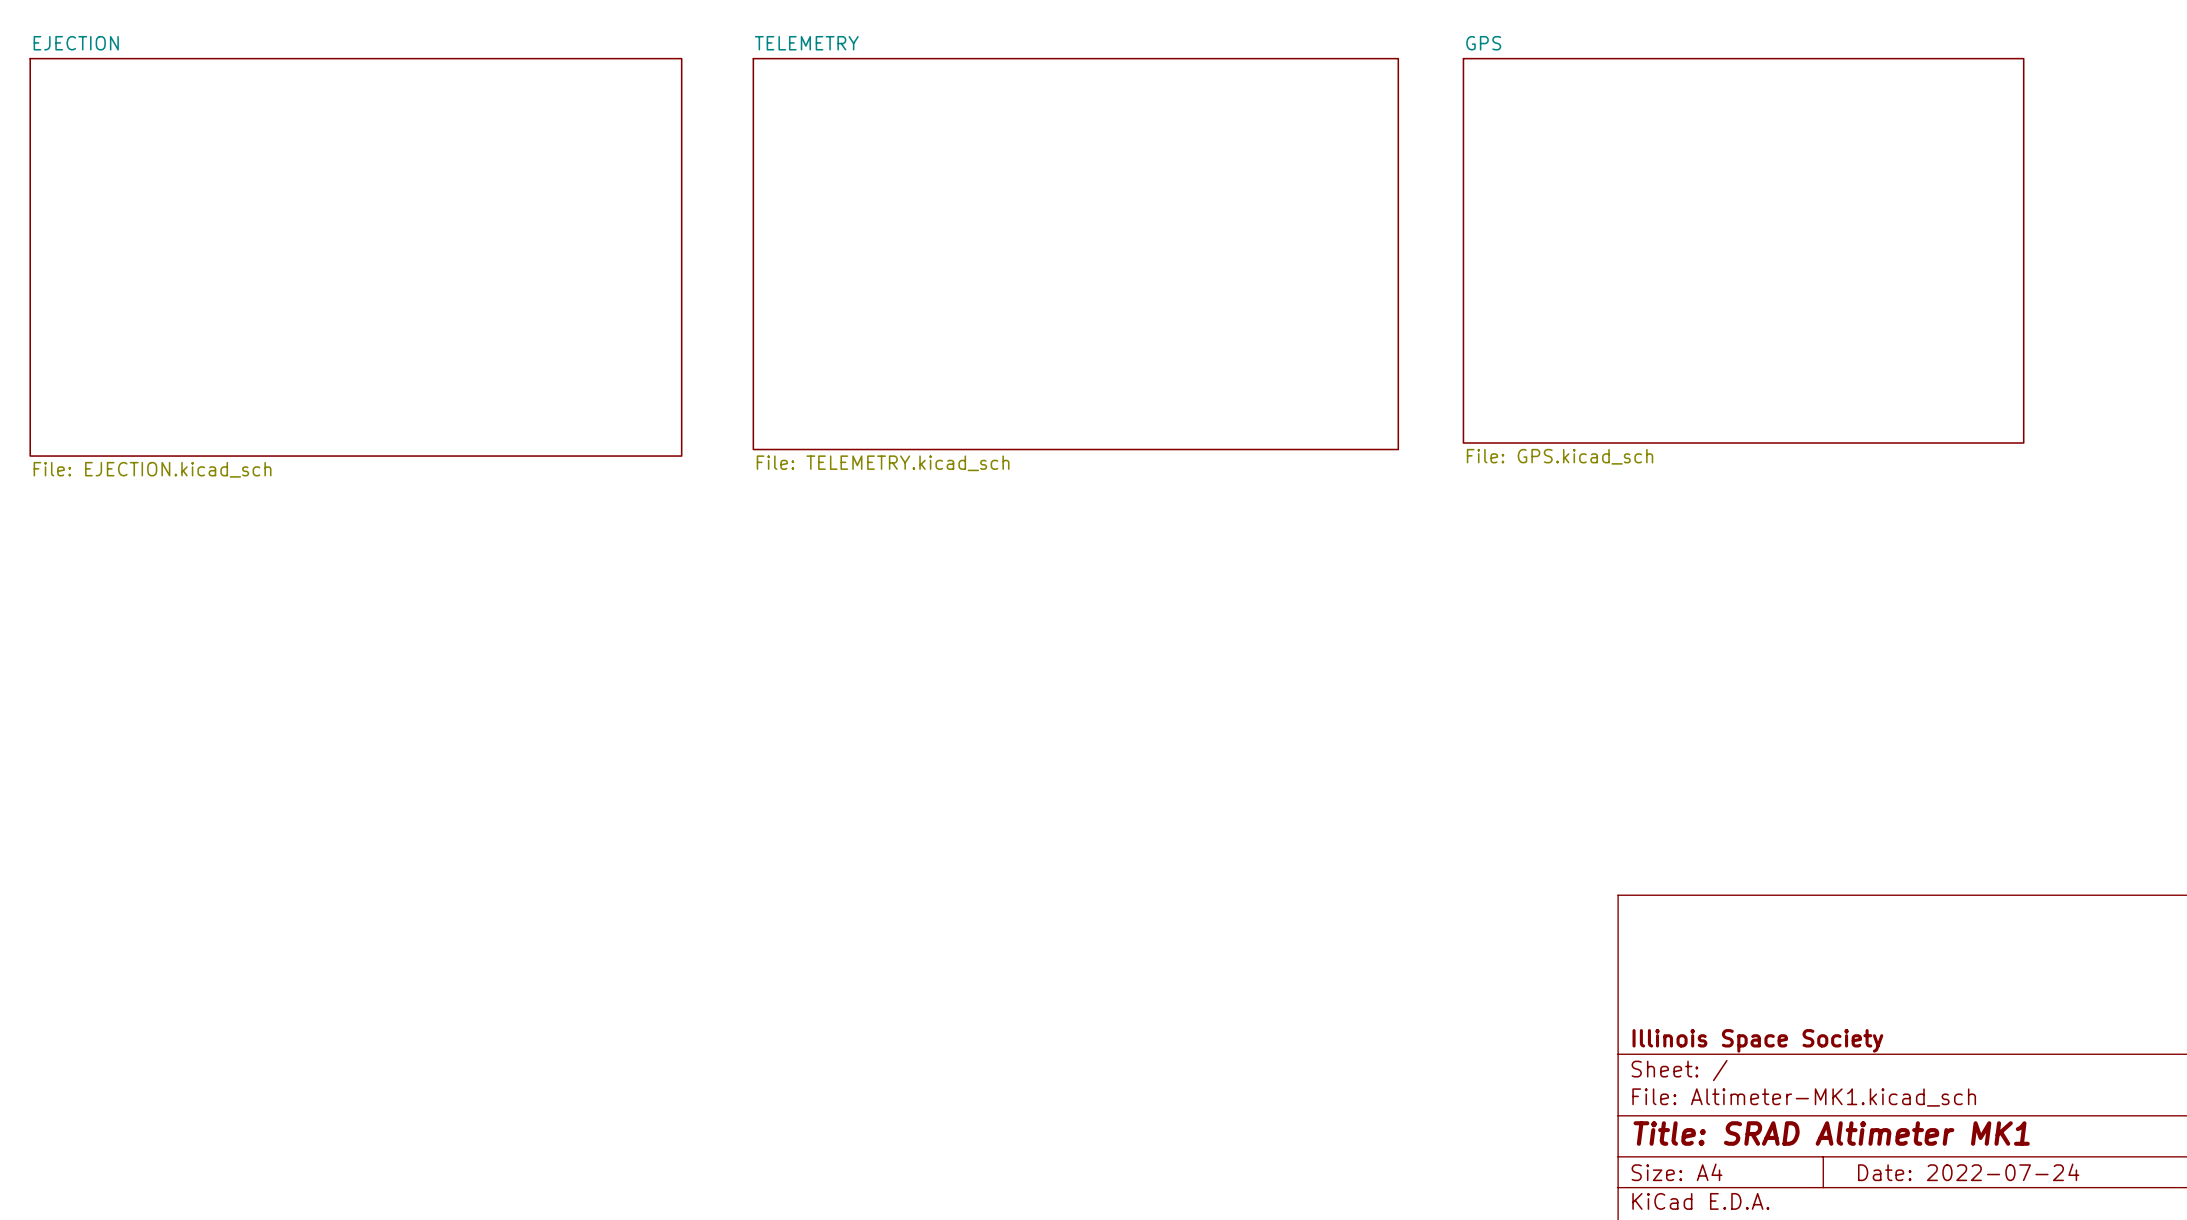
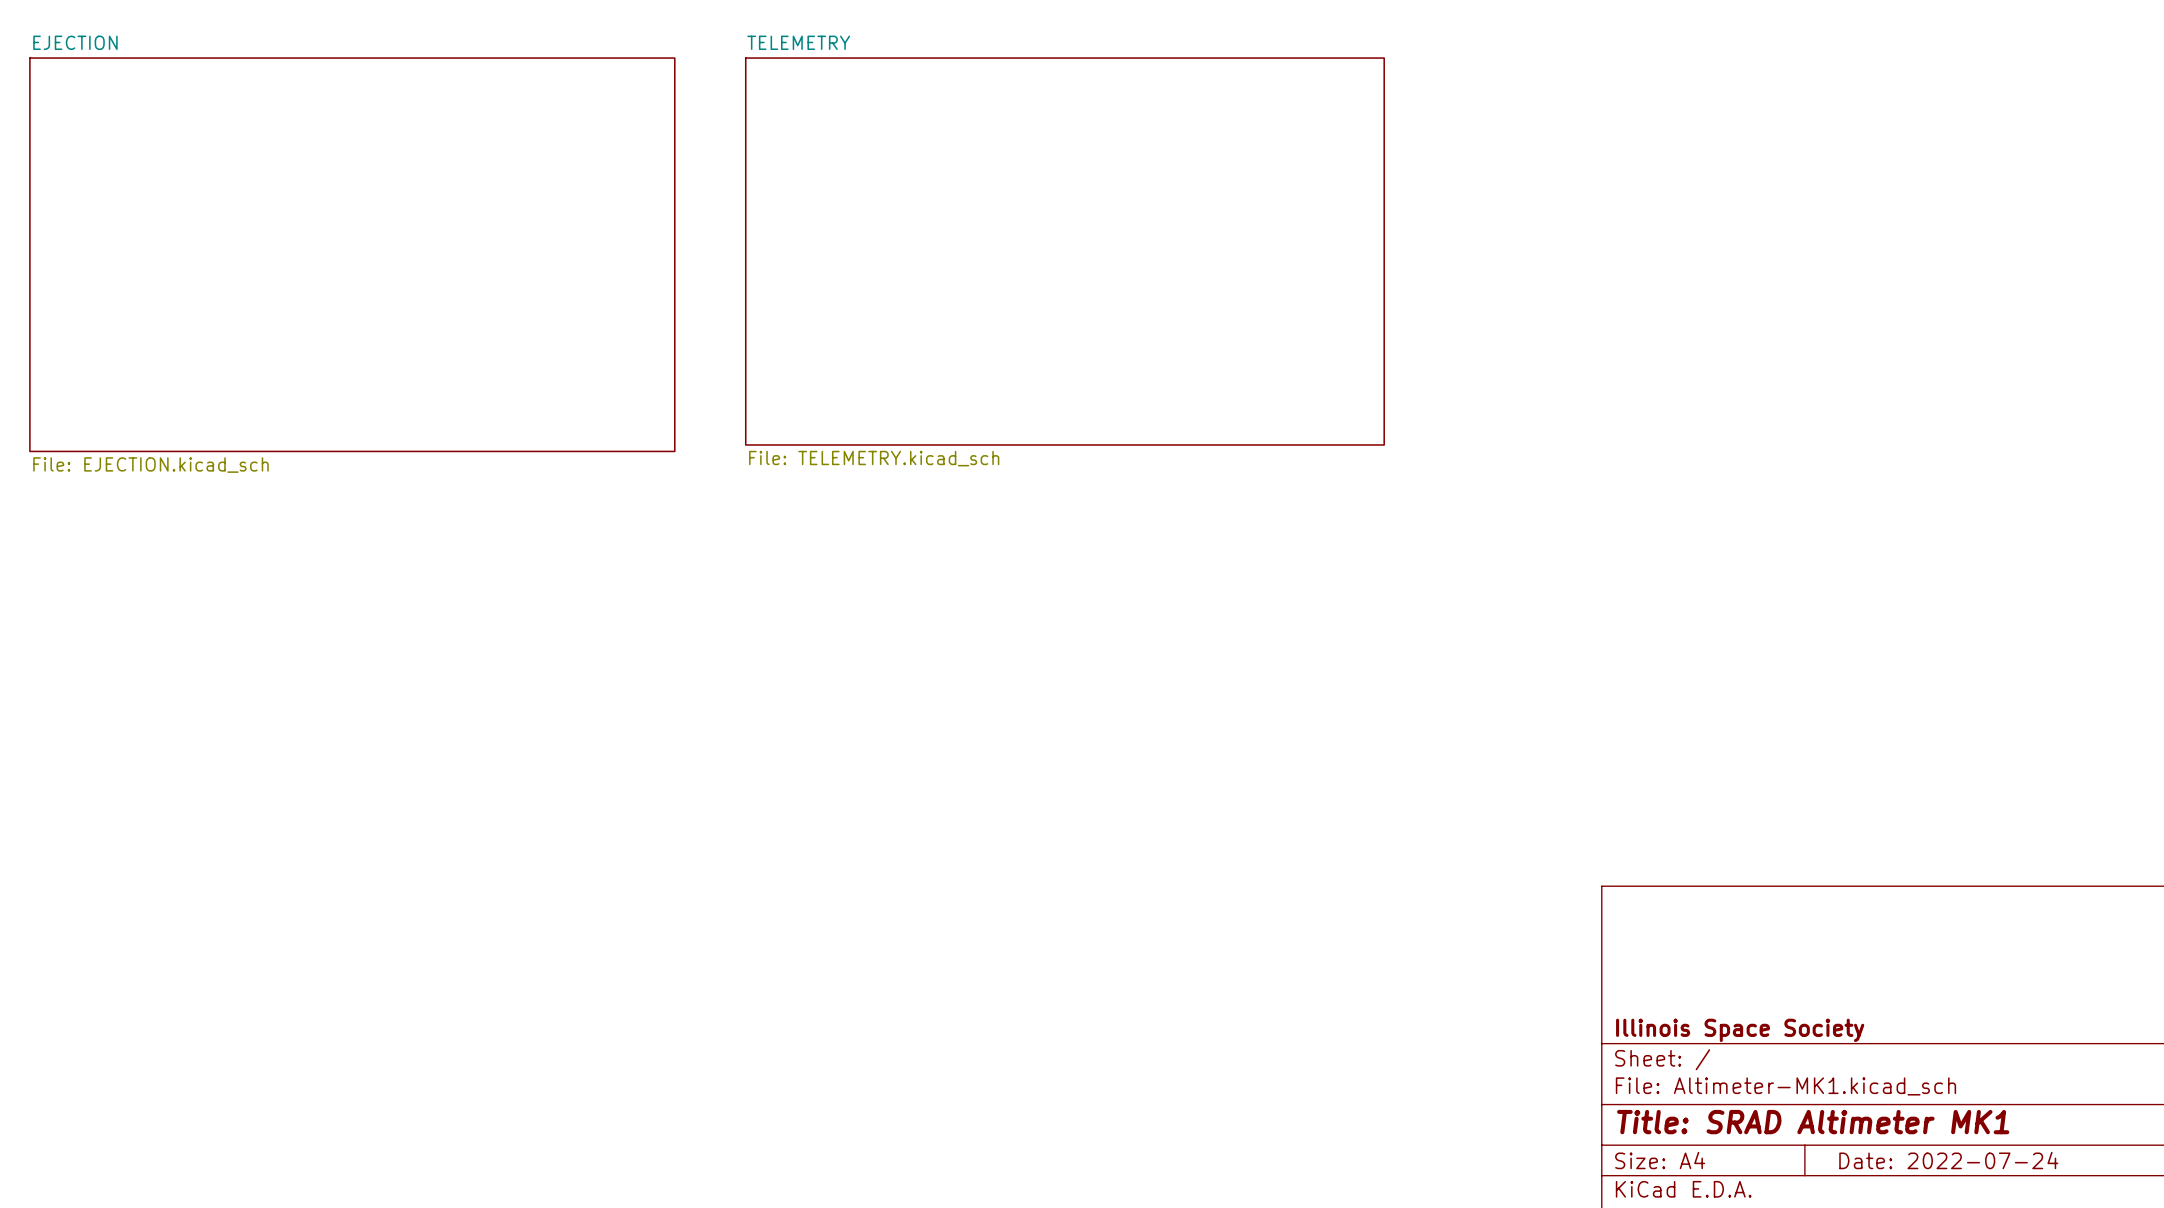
sheet GPS: File: GPS.kicad_sch (1743, 250) -> none

